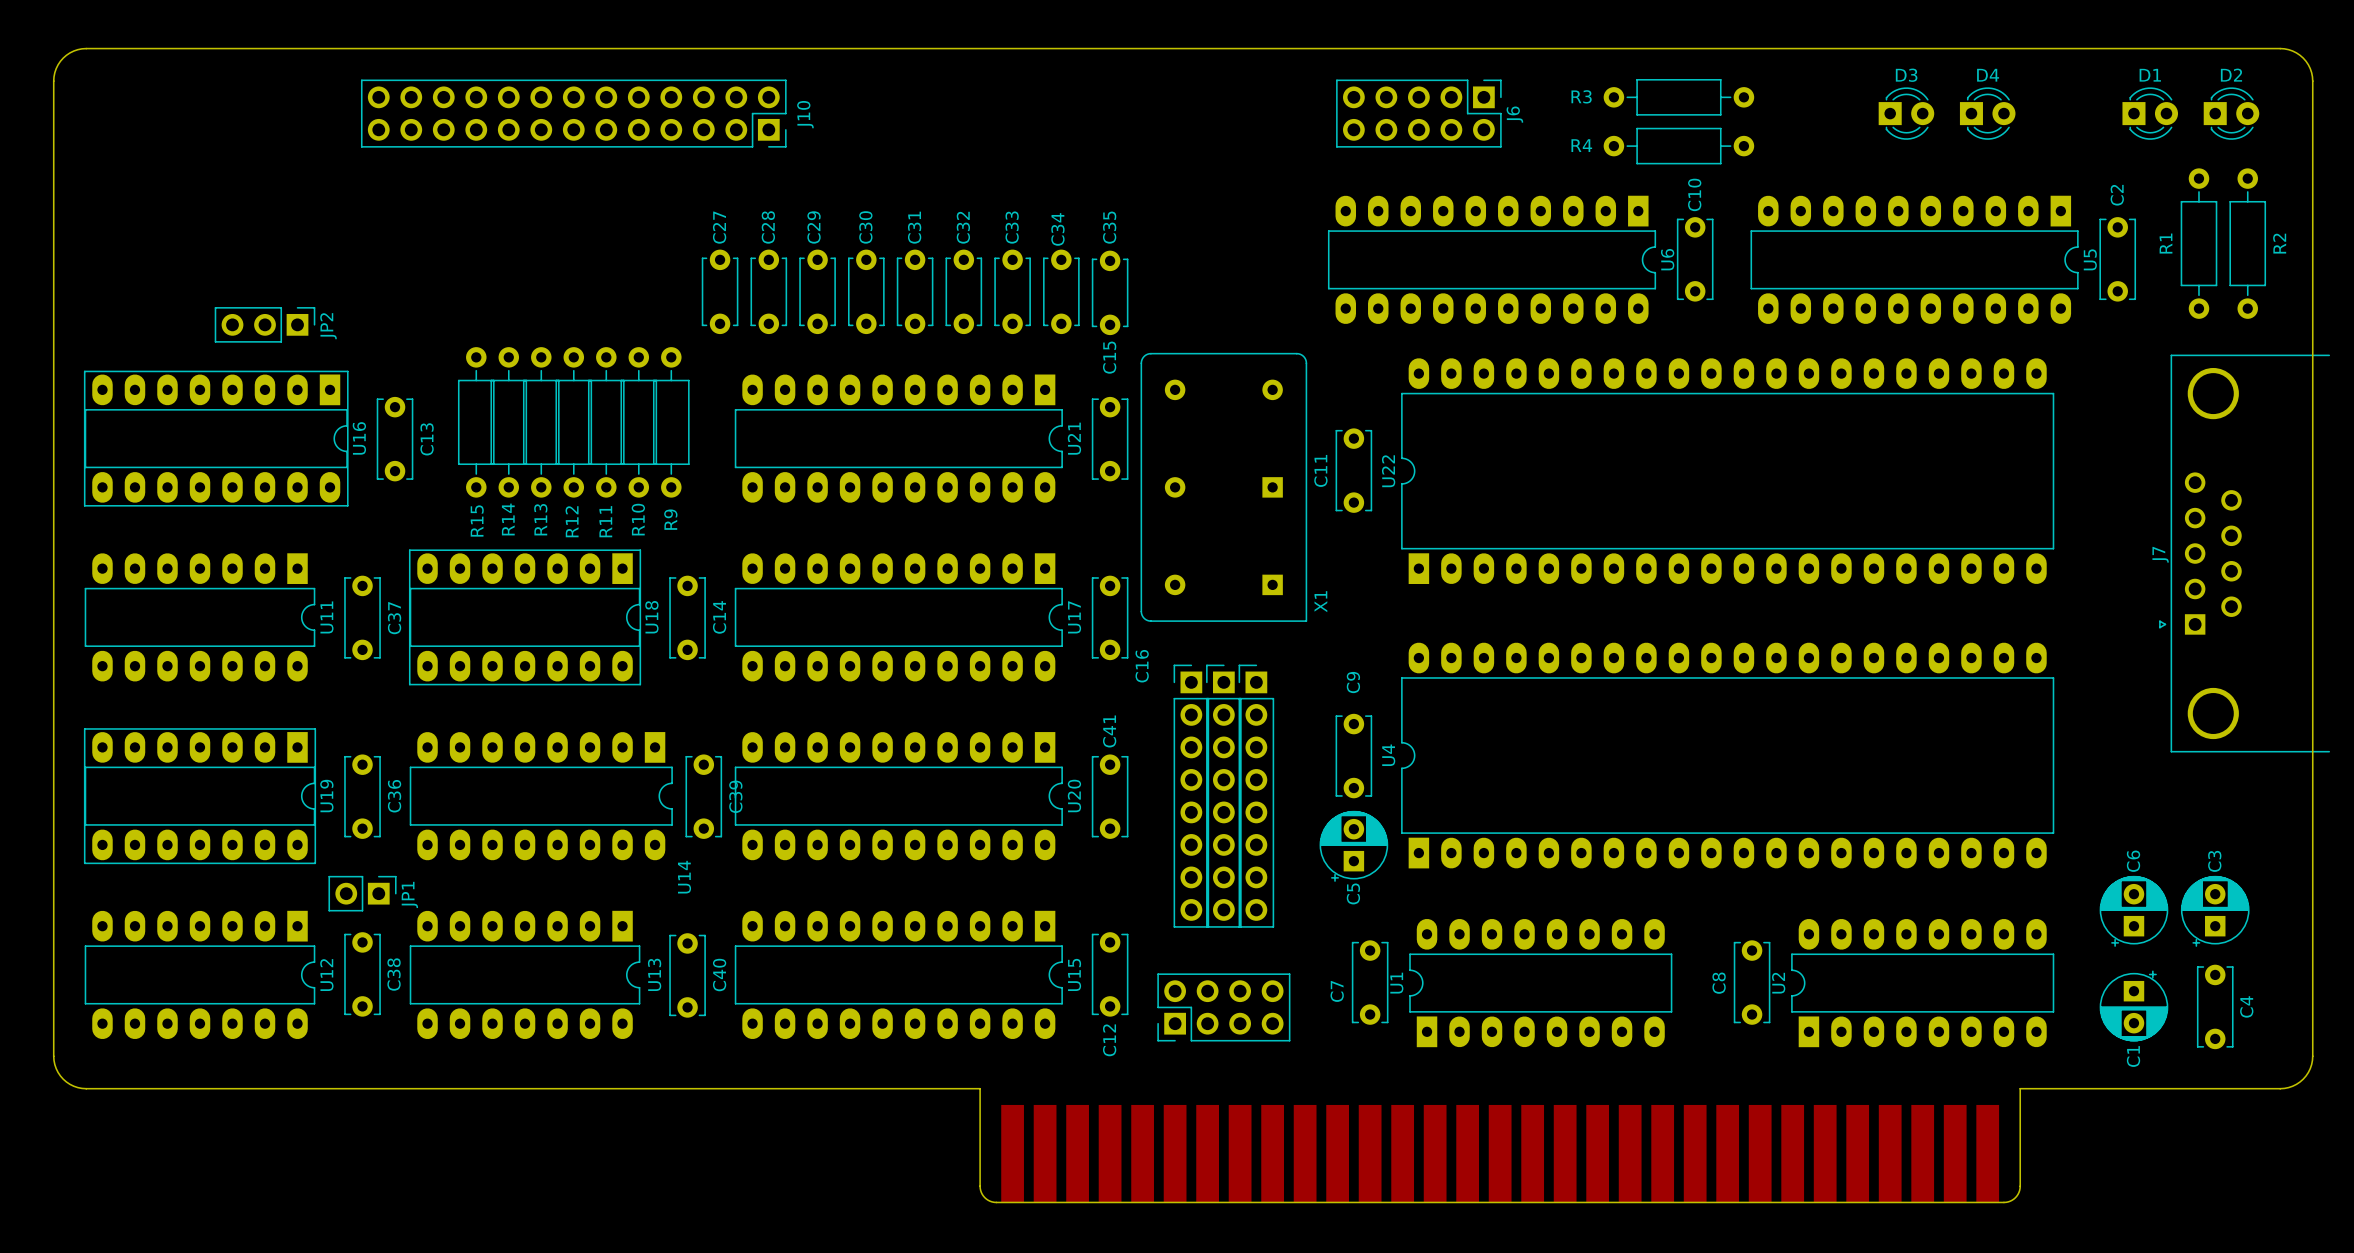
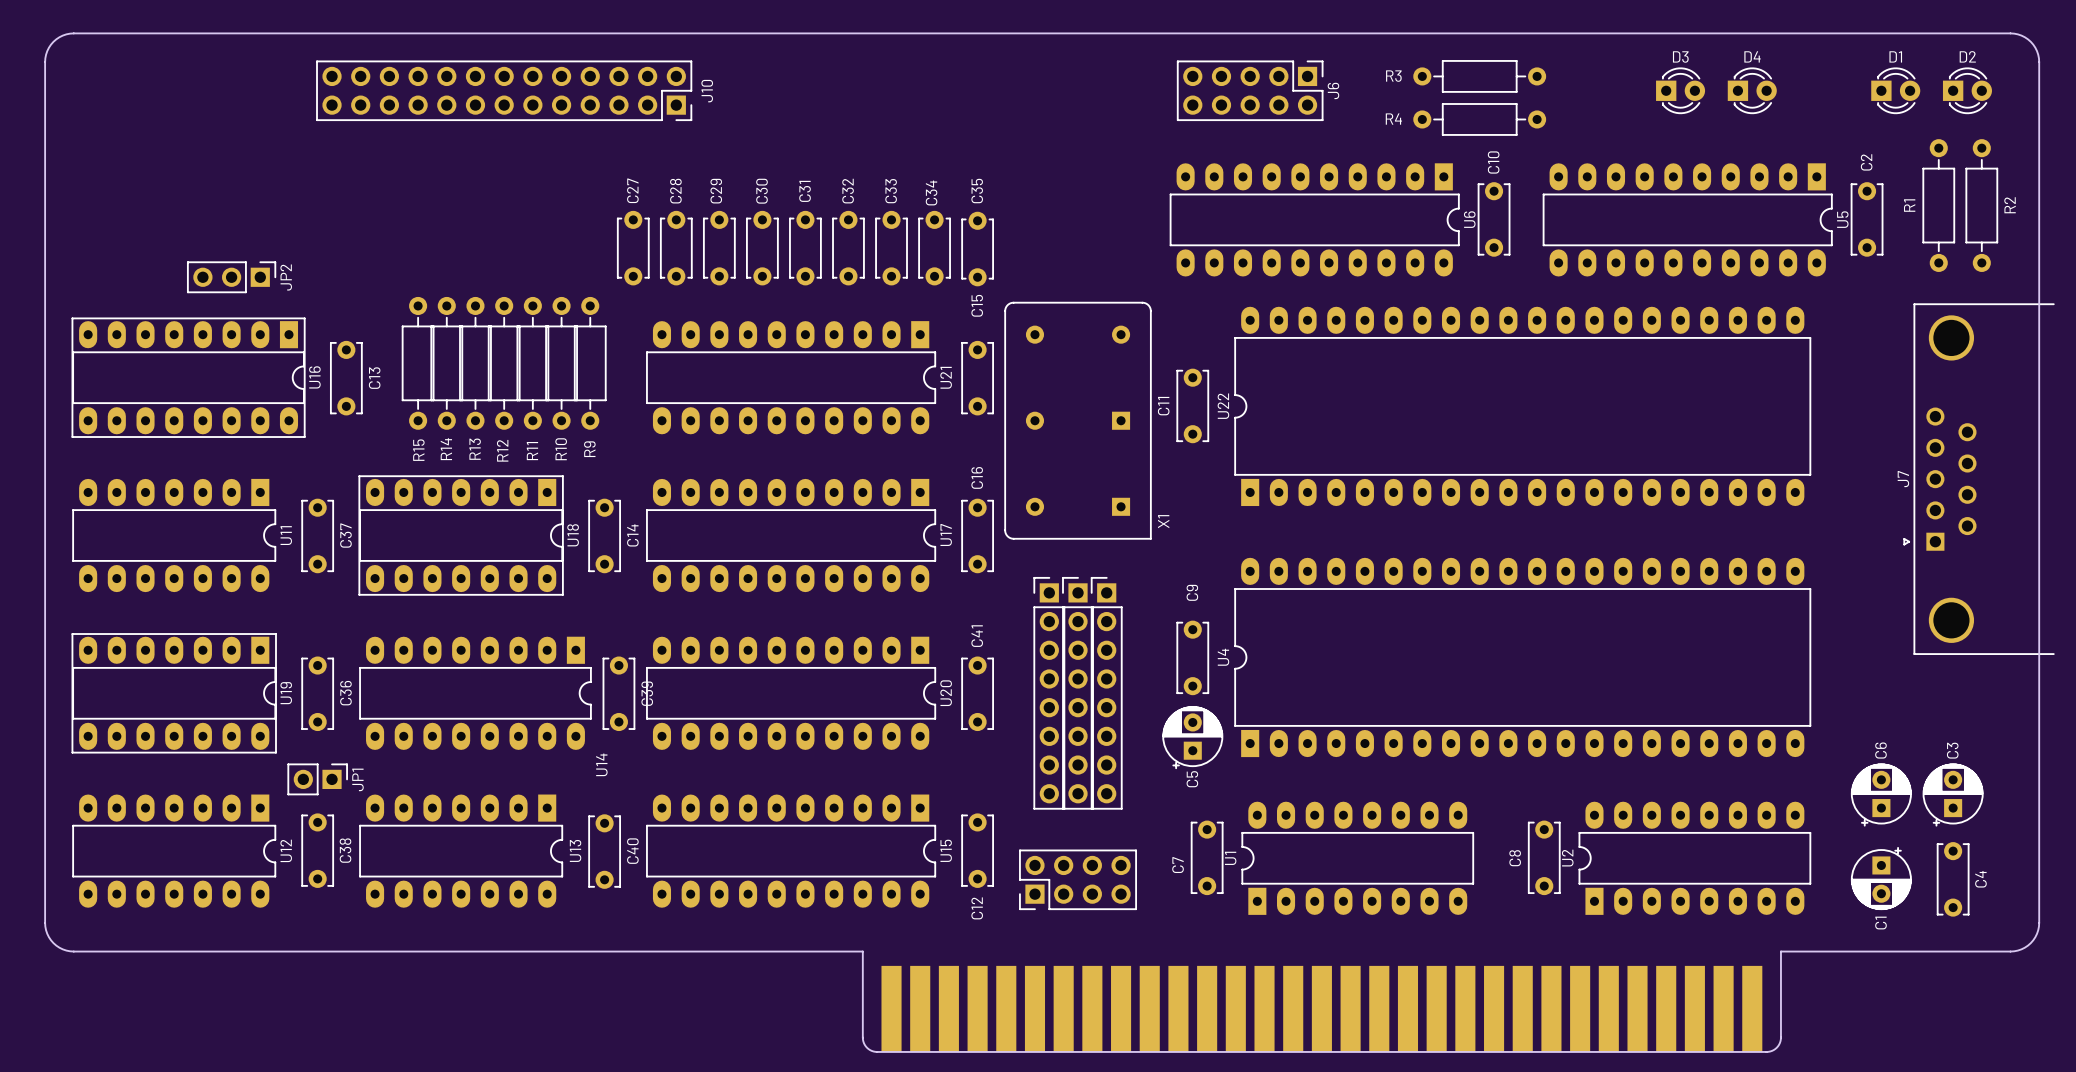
C16 name position: C16 (1142, 666) -> C16 (977, 477)

